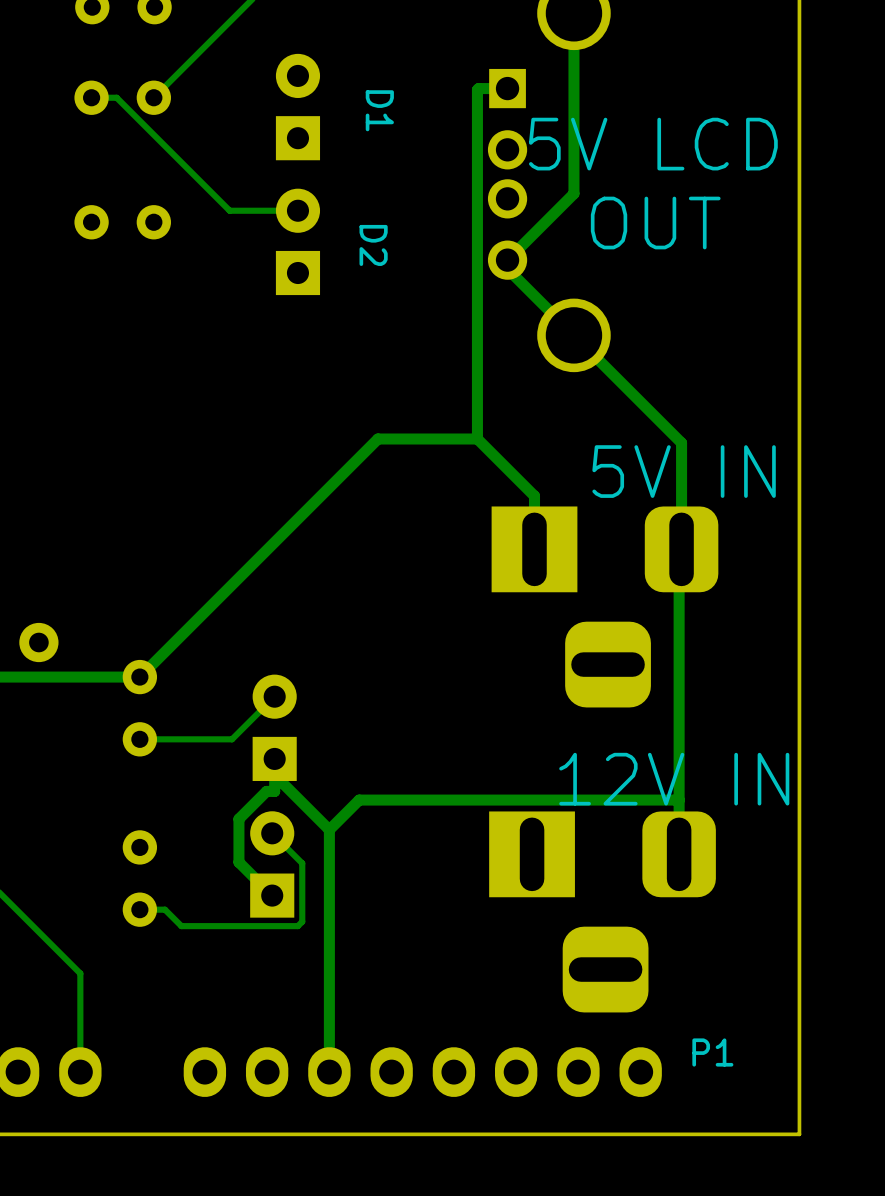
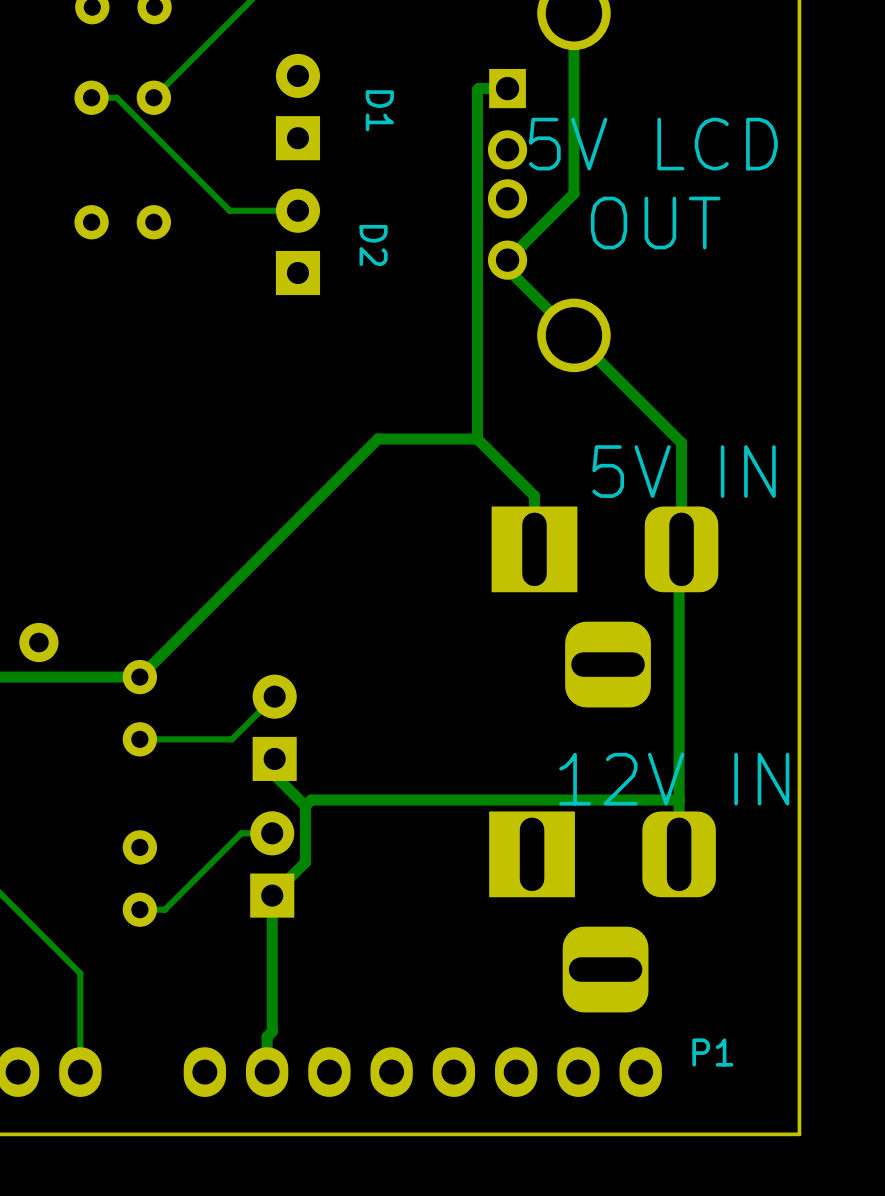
track: (274, 775) (274, 791) (266, 791) (238, 819) (238, 862) (272, 895) -> none
track: (359, 800) (329, 829) -> (359, 800) (311, 800) (305, 805) (305, 862) (272, 895) (272, 1031) (267, 1036) (267, 1072)
track: (305, 805) (329, 829) -> none
track: (329, 829) (329, 1072) -> none
track: (272, 833) (302, 863) (302, 921) (297, 926) (181, 926) (165, 909) -> (272, 833) (241, 833) (165, 909)

